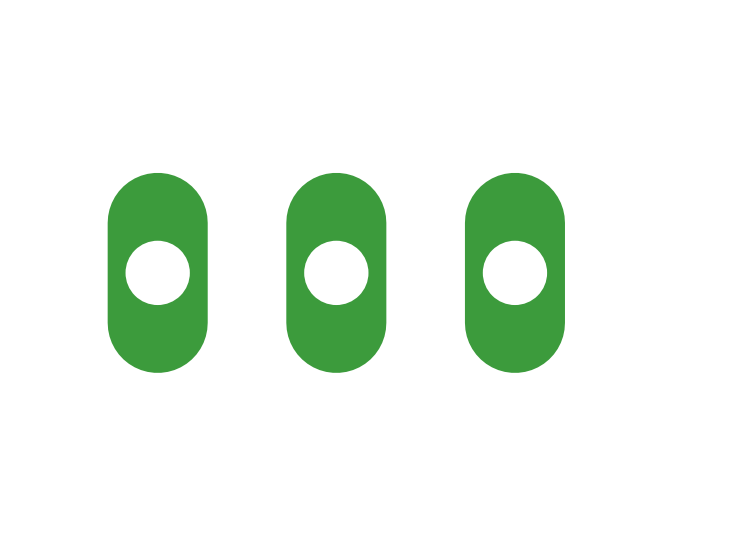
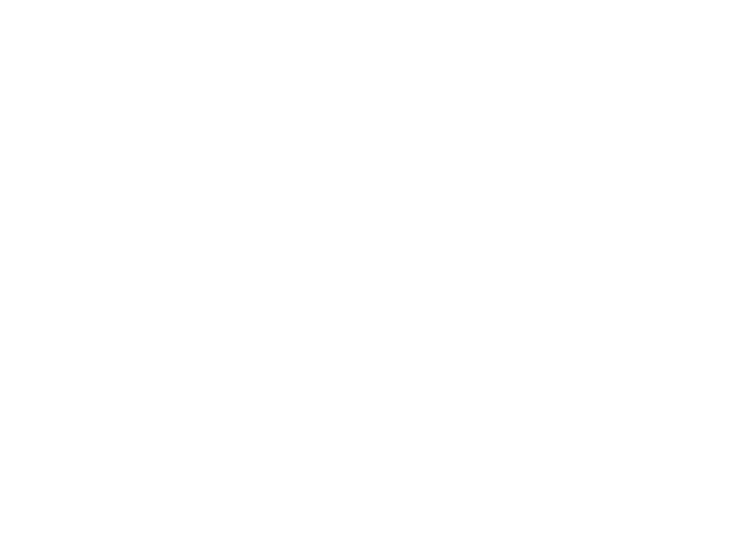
part: (336, 272) -> none

